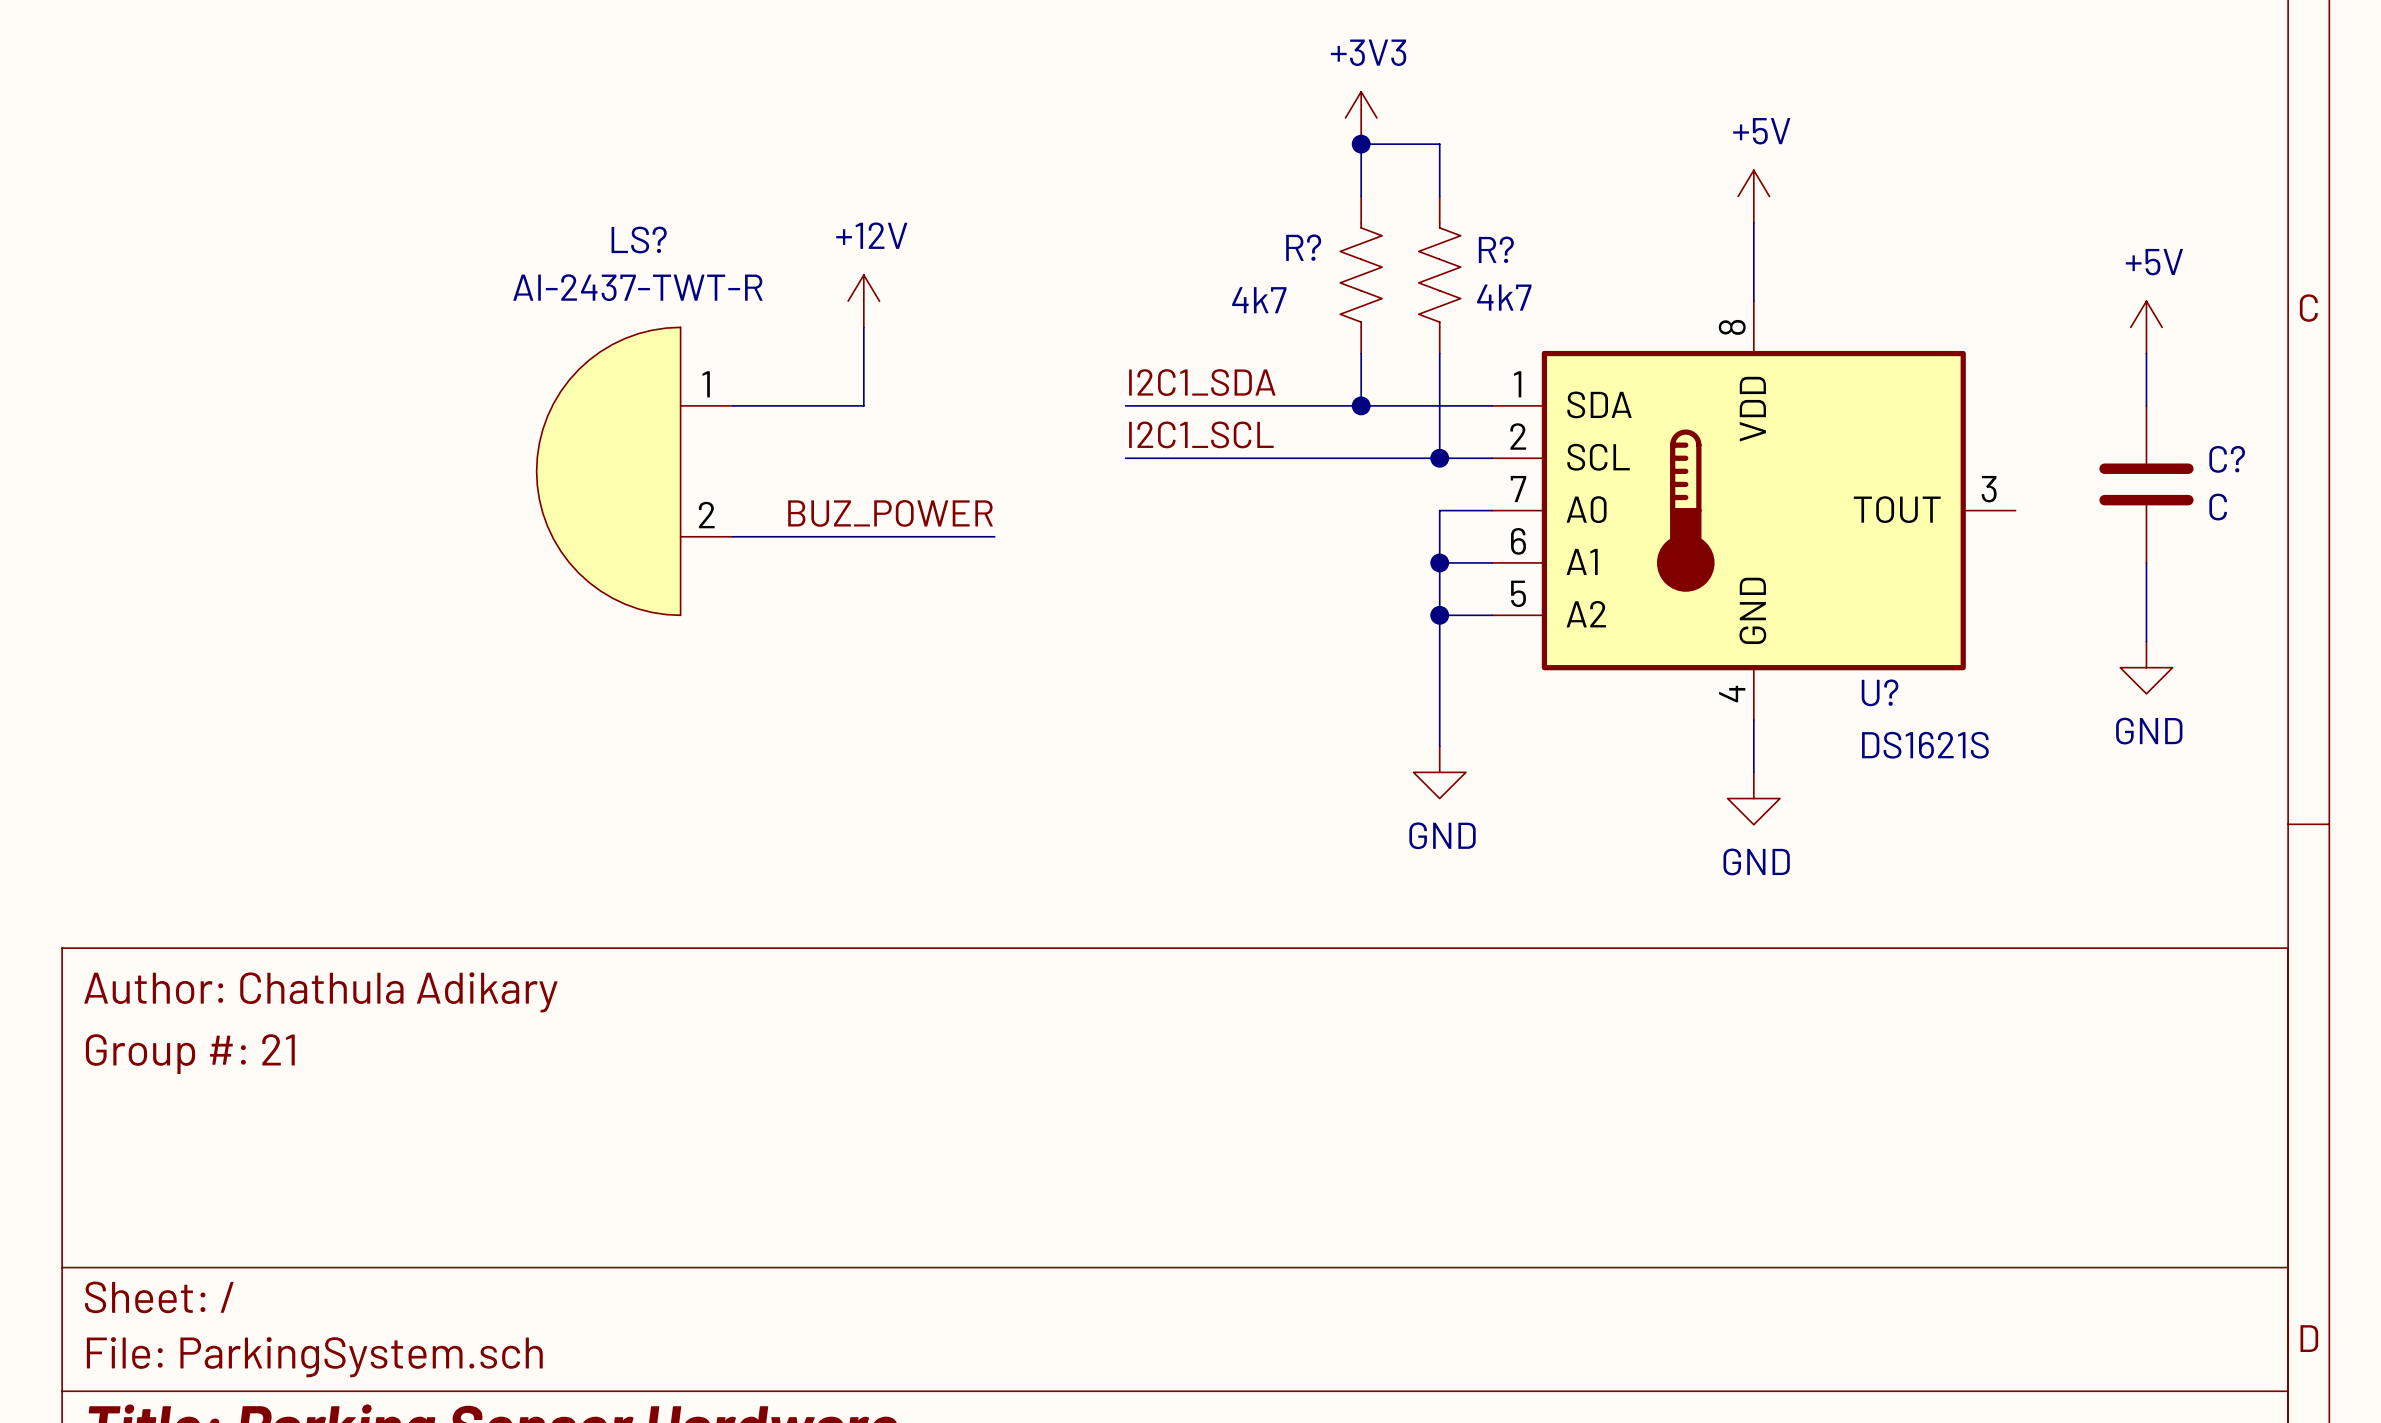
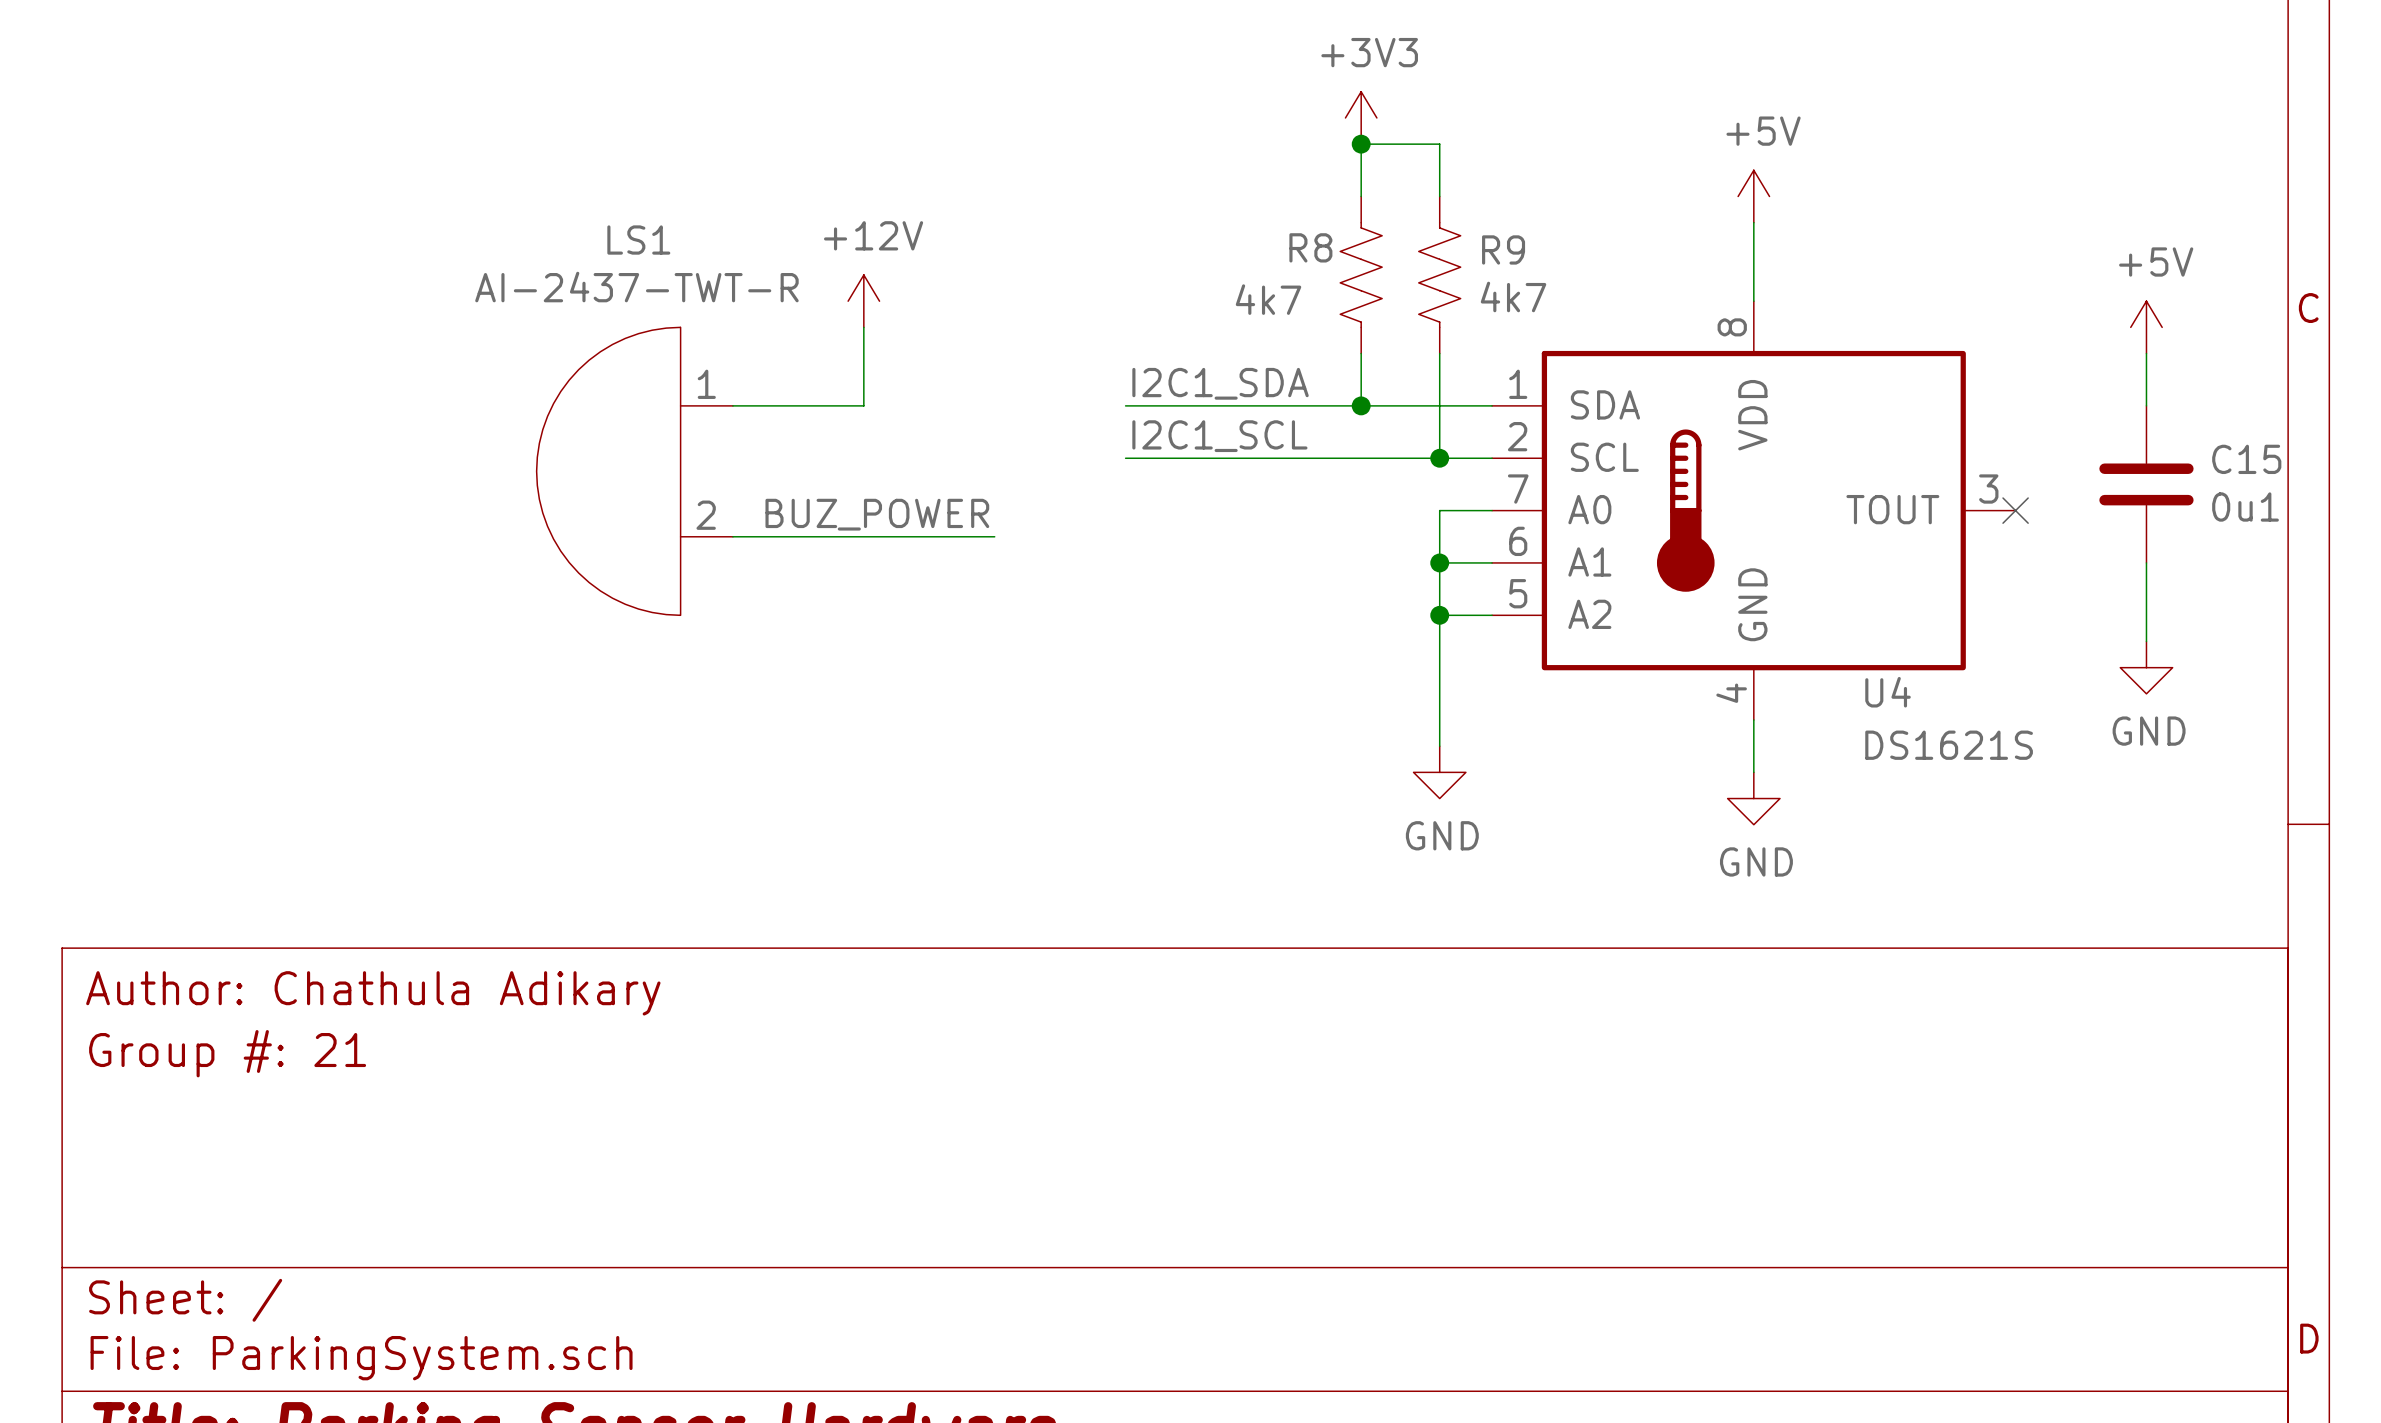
LS? name: LS? (639, 239) -> LS1 (638, 240)
R? name: R? (1303, 247) -> R8 (1310, 247)
R? name: R? (1496, 249) -> R9 (1503, 249)
C? name: C? (2227, 459) -> C15 (2246, 459)
C? value: C (2218, 507) -> 0u1 (2245, 507)
no-connect mark: none -> (2015, 510)
U? name: U? (1880, 692) -> U4 (1888, 692)

